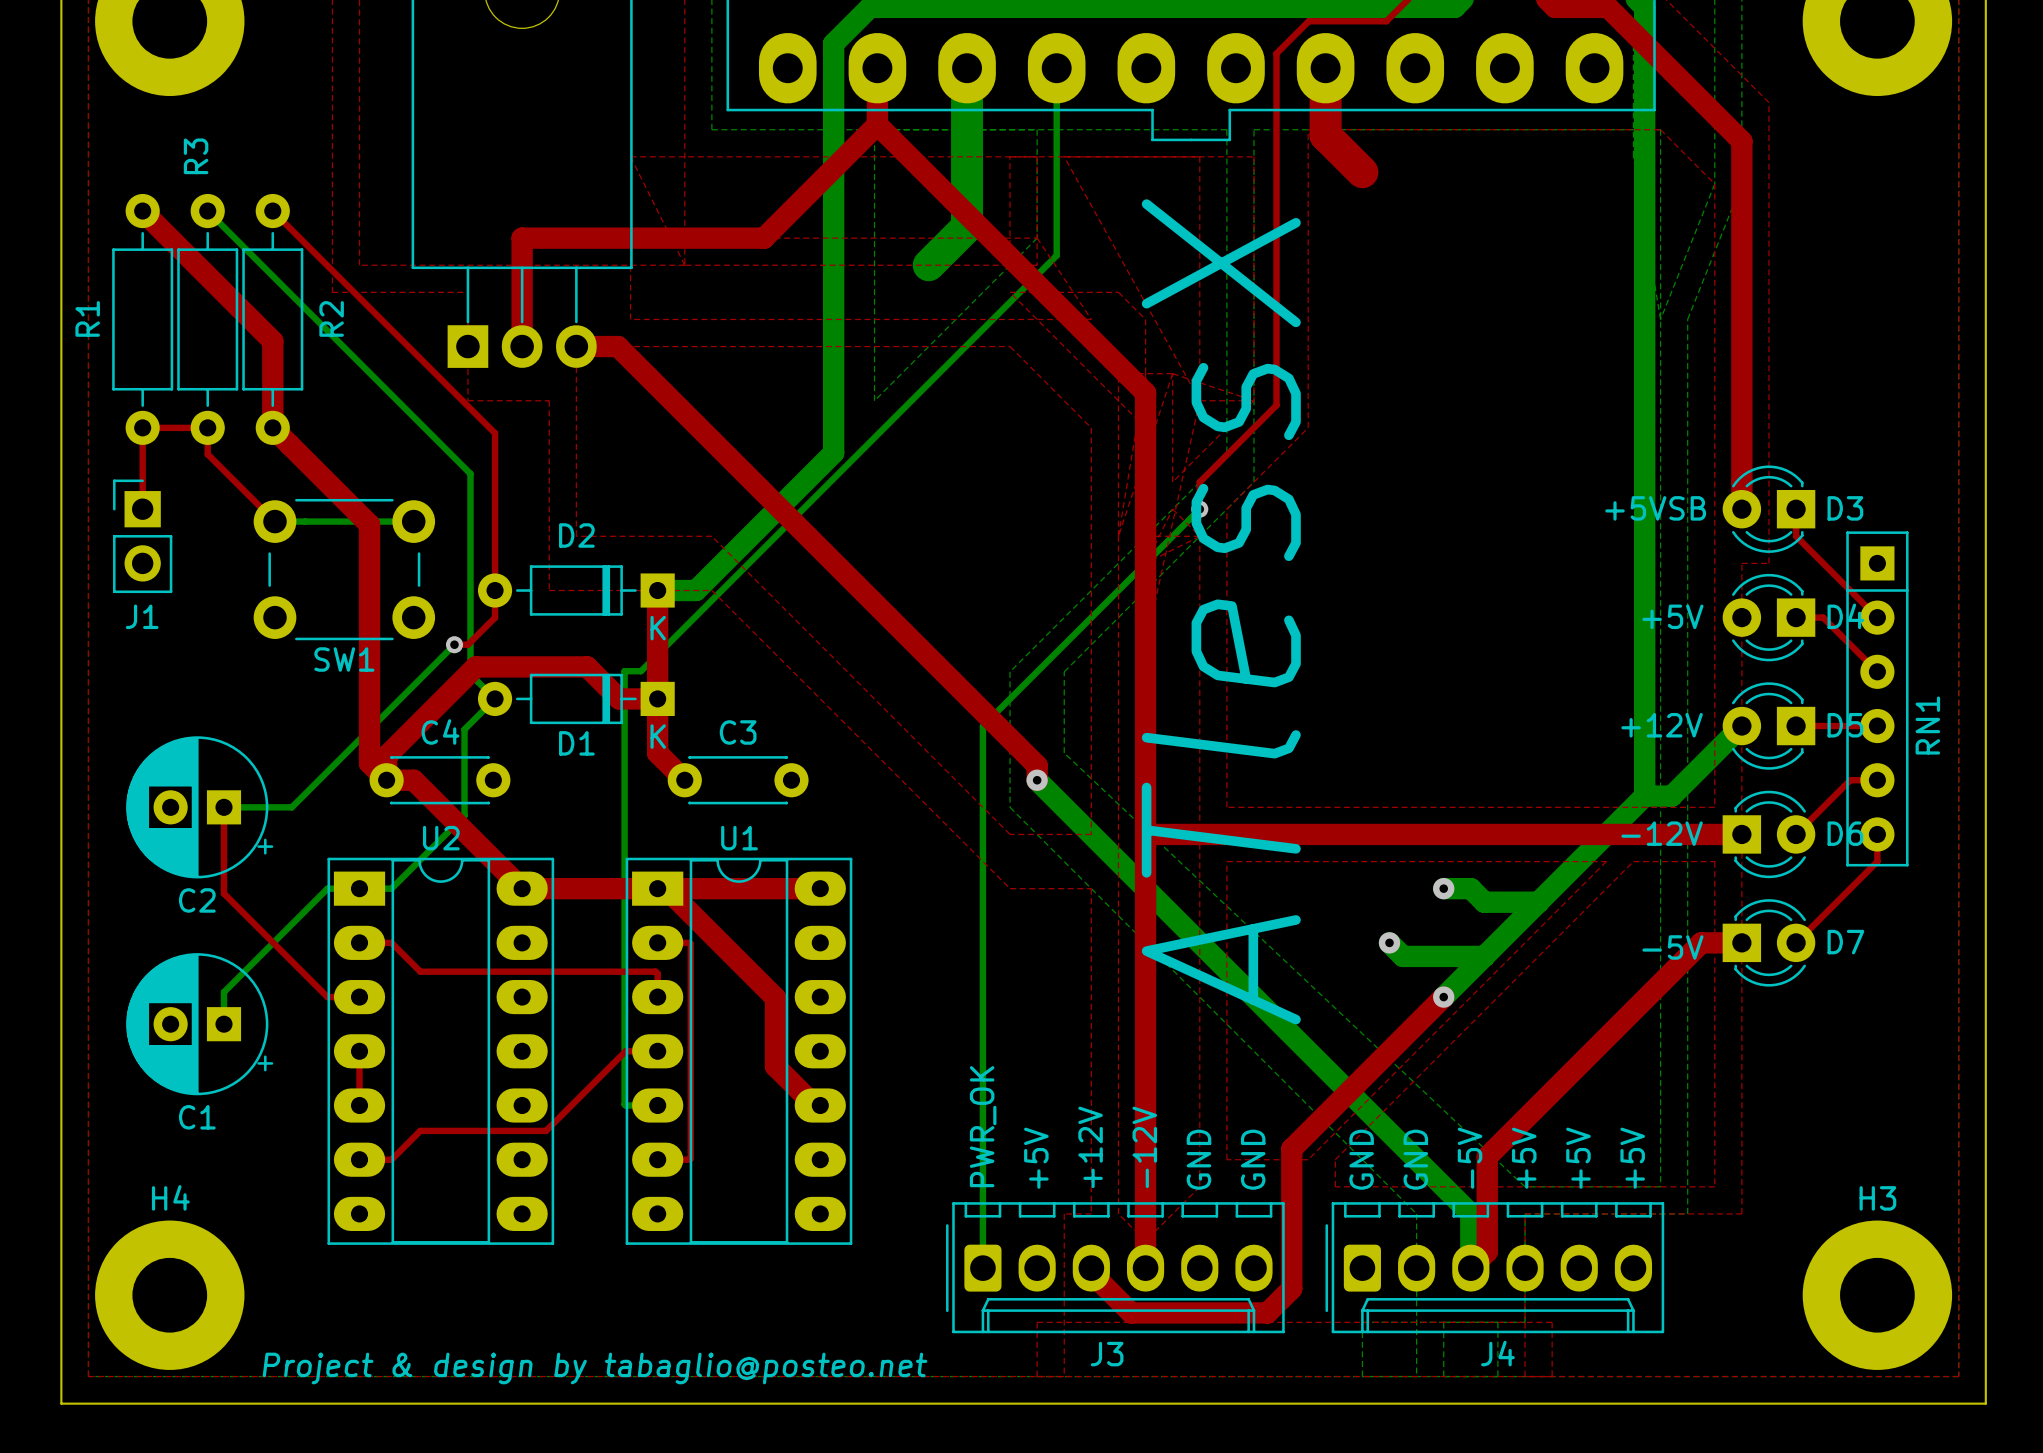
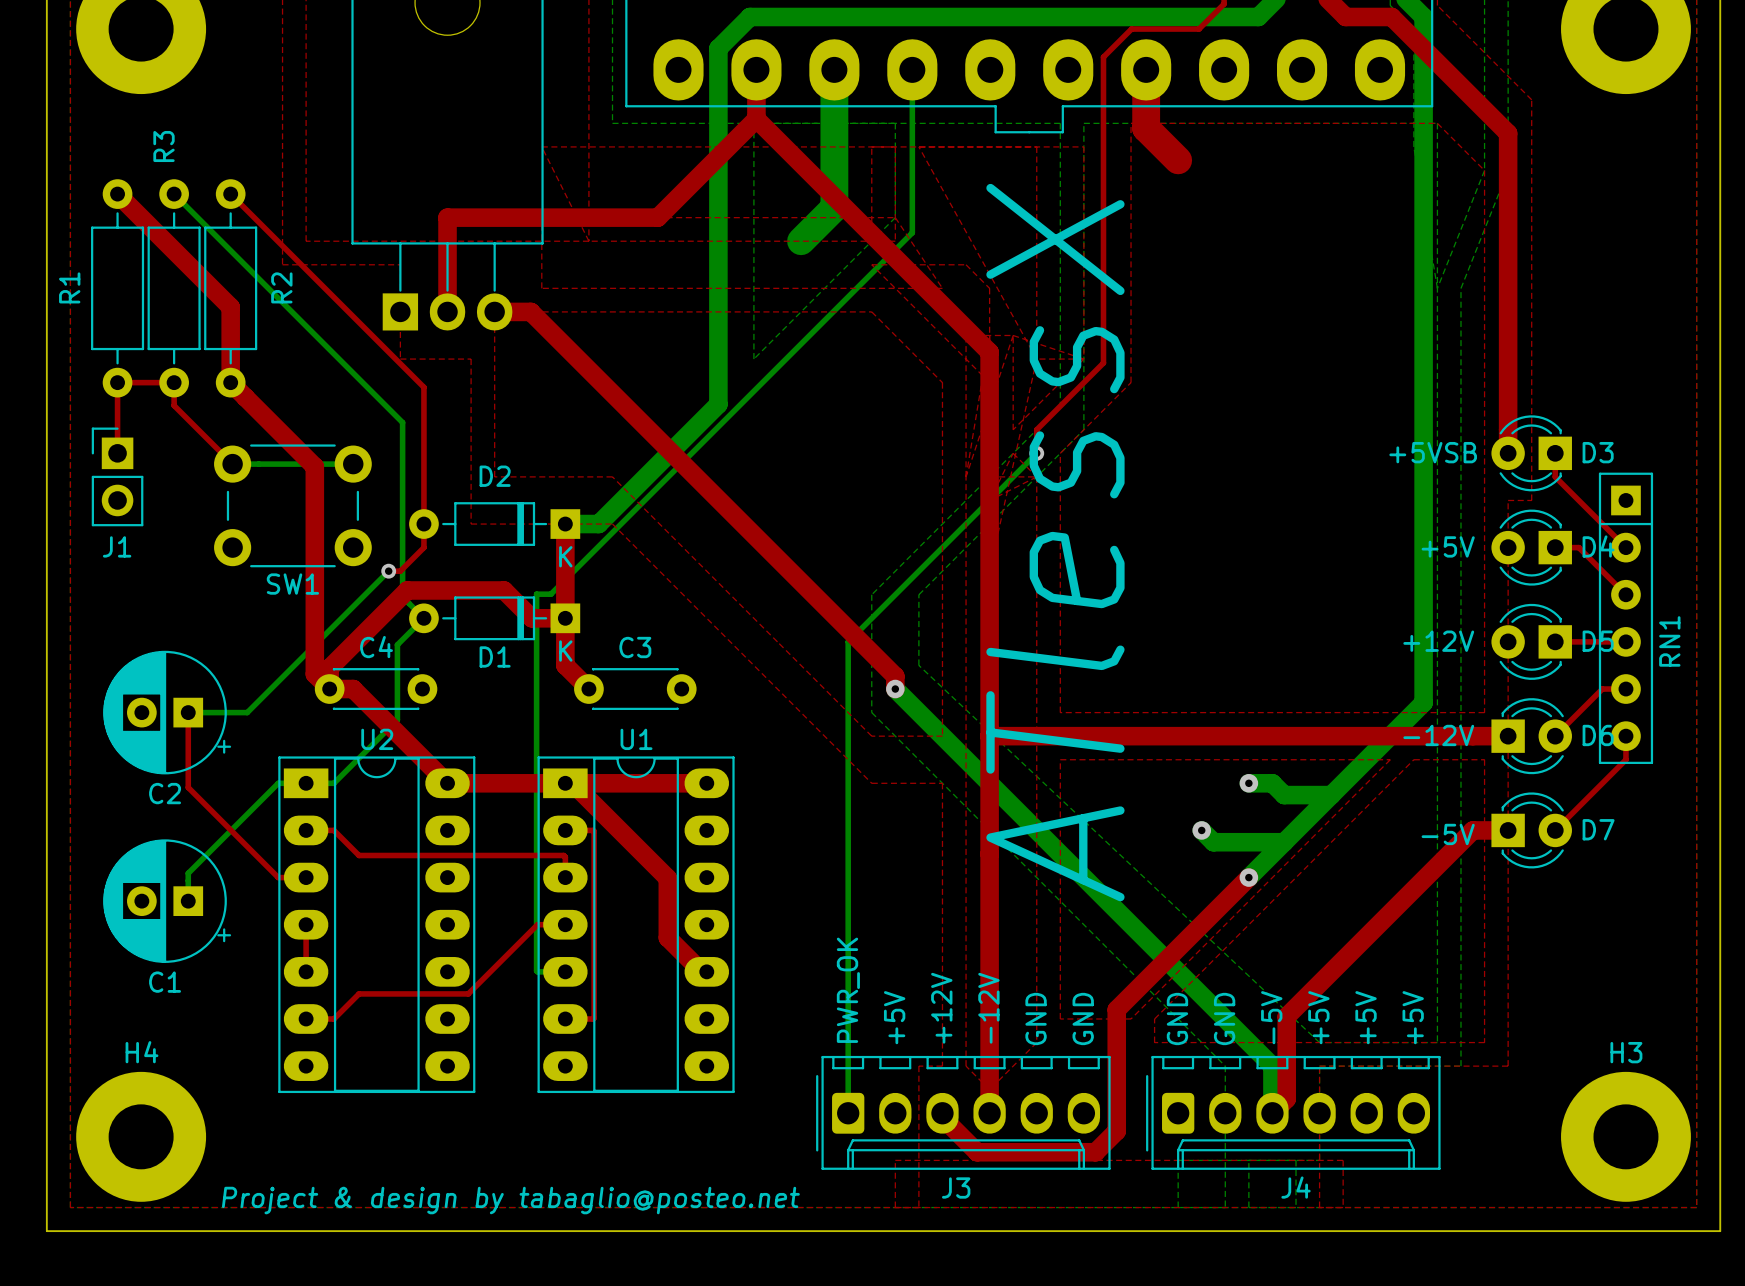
bottom track: (1741, 726) (1671, 796) (1644, 796) -> none

